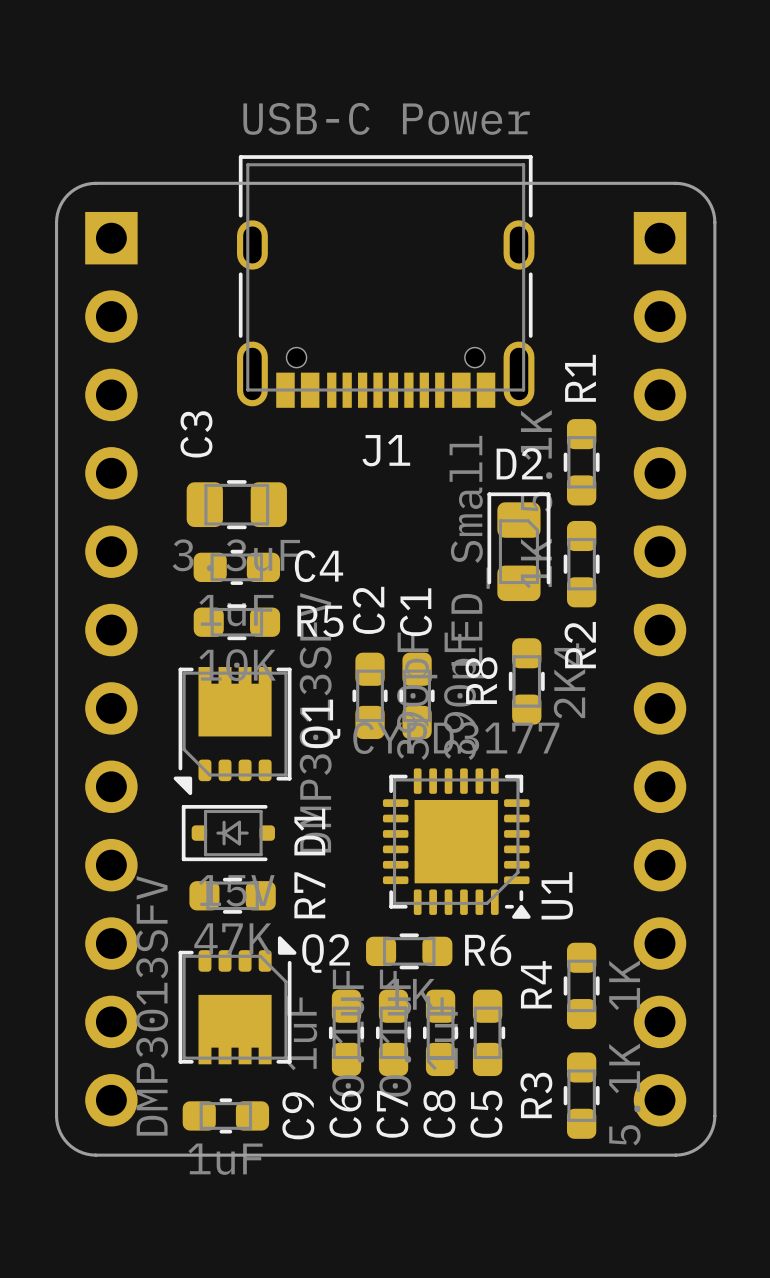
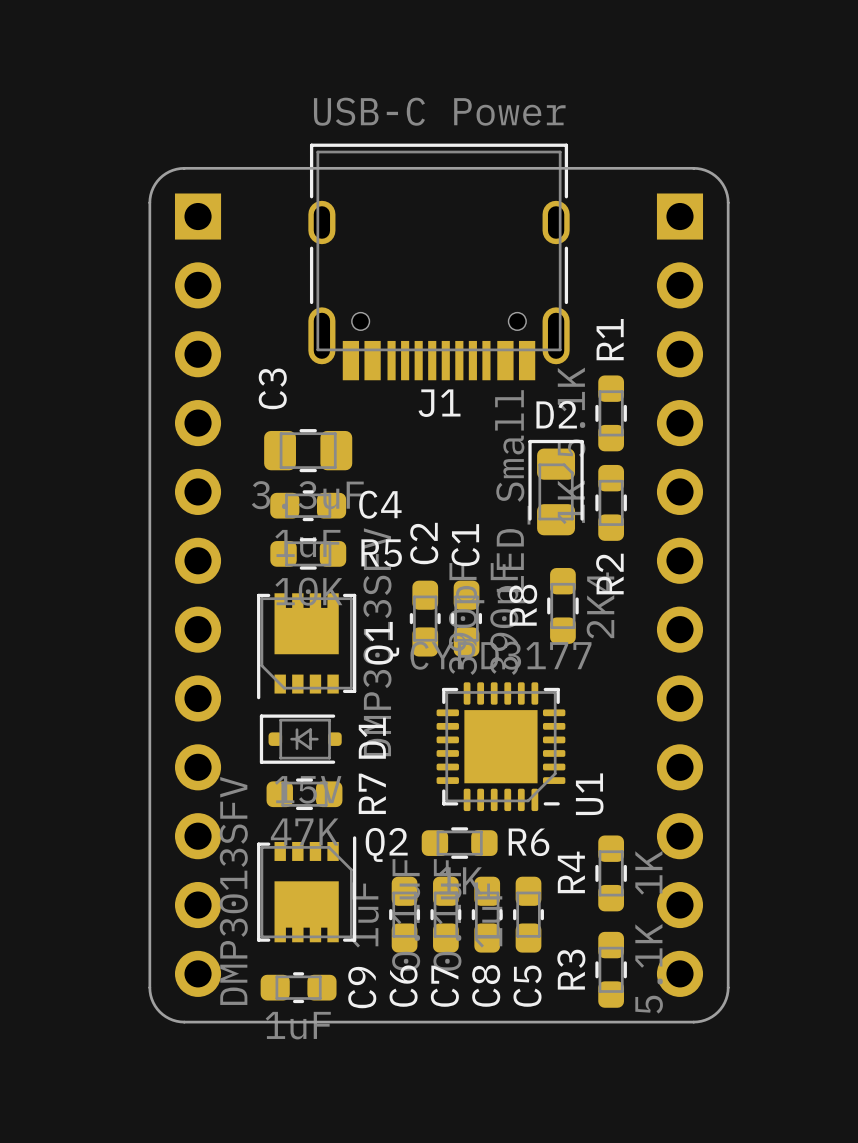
J1 footprint: [236, 155, 535, 408] -> [308, 143, 570, 381]
Q1 footprint: [173, 667, 292, 796] -> [257, 593, 357, 700]
U1 footprint: [382, 768, 531, 919] -> [436, 682, 566, 812]
Q2 footprint: [178, 936, 297, 1065] -> [257, 836, 357, 943]

